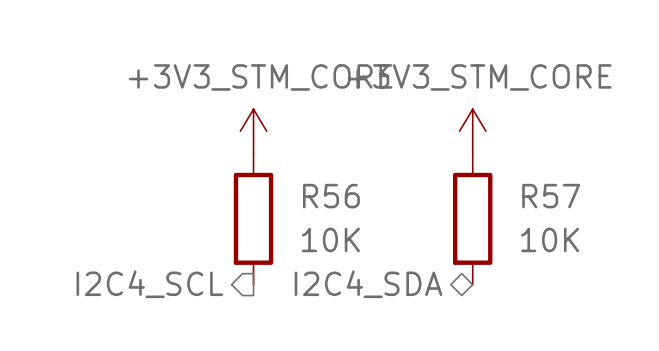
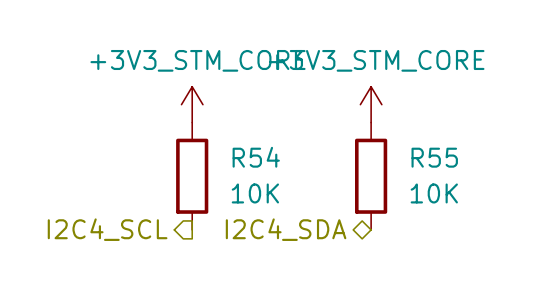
R56 name: R56 (331, 196) -> R54 (256, 157)
R57 name: R57 (551, 196) -> R55 (434, 157)

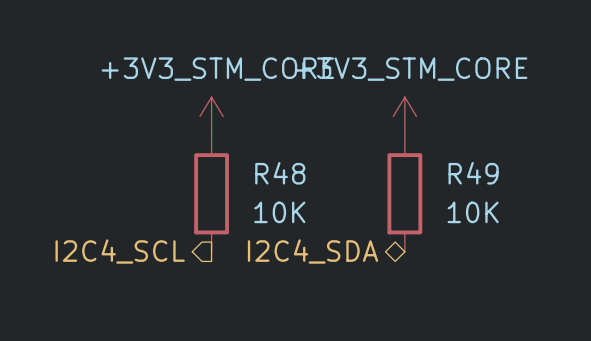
R54 name: R54 (256, 157) -> R48 (280, 173)
R55 name: R55 (434, 157) -> R49 (473, 173)

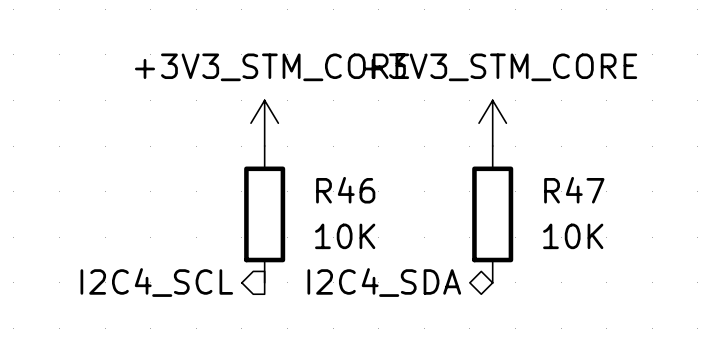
R48 name: R48 (280, 173) -> R46 (345, 190)
R49 name: R49 (473, 173) -> R47 (574, 190)

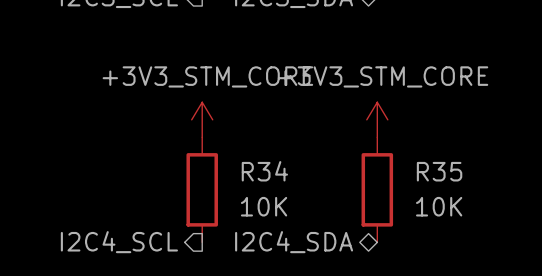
R46 name: R46 (345, 190) -> R34 (264, 171)
R47 name: R47 (574, 190) -> R35 (439, 171)

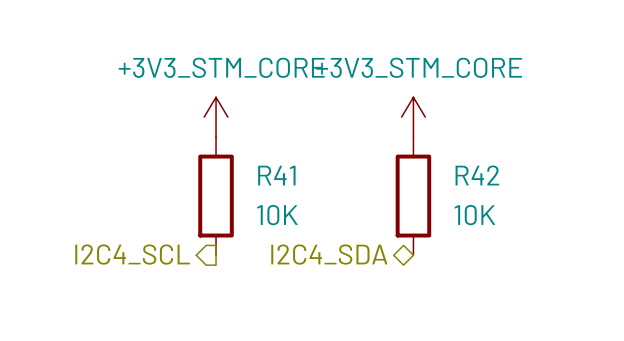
R34 name: R34 (264, 171) -> R41 (276, 175)
R35 name: R35 (439, 171) -> R42 (477, 175)

